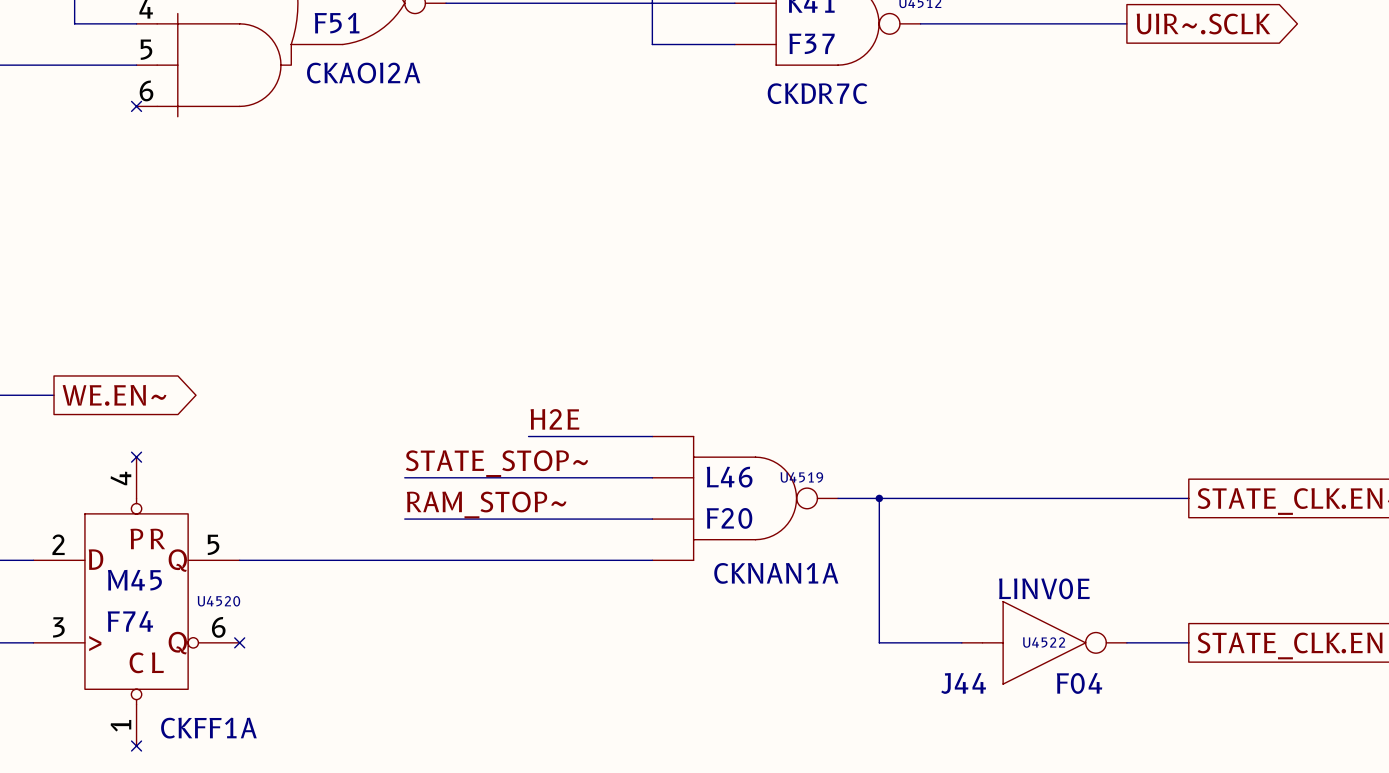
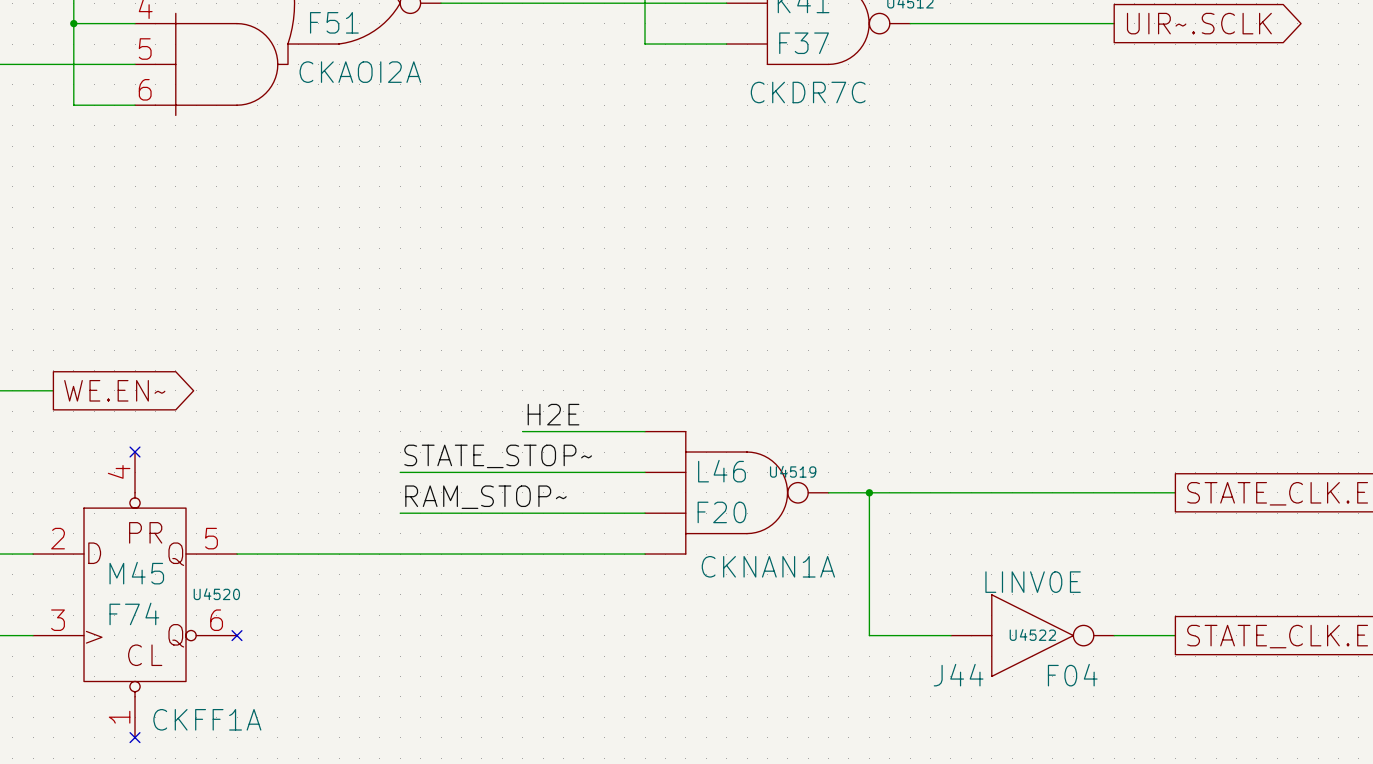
wire: none -> (73, 23) (73, 105) (135, 105)
junction: none -> (73, 23)
no-connect mark: (136, 106) -> none

